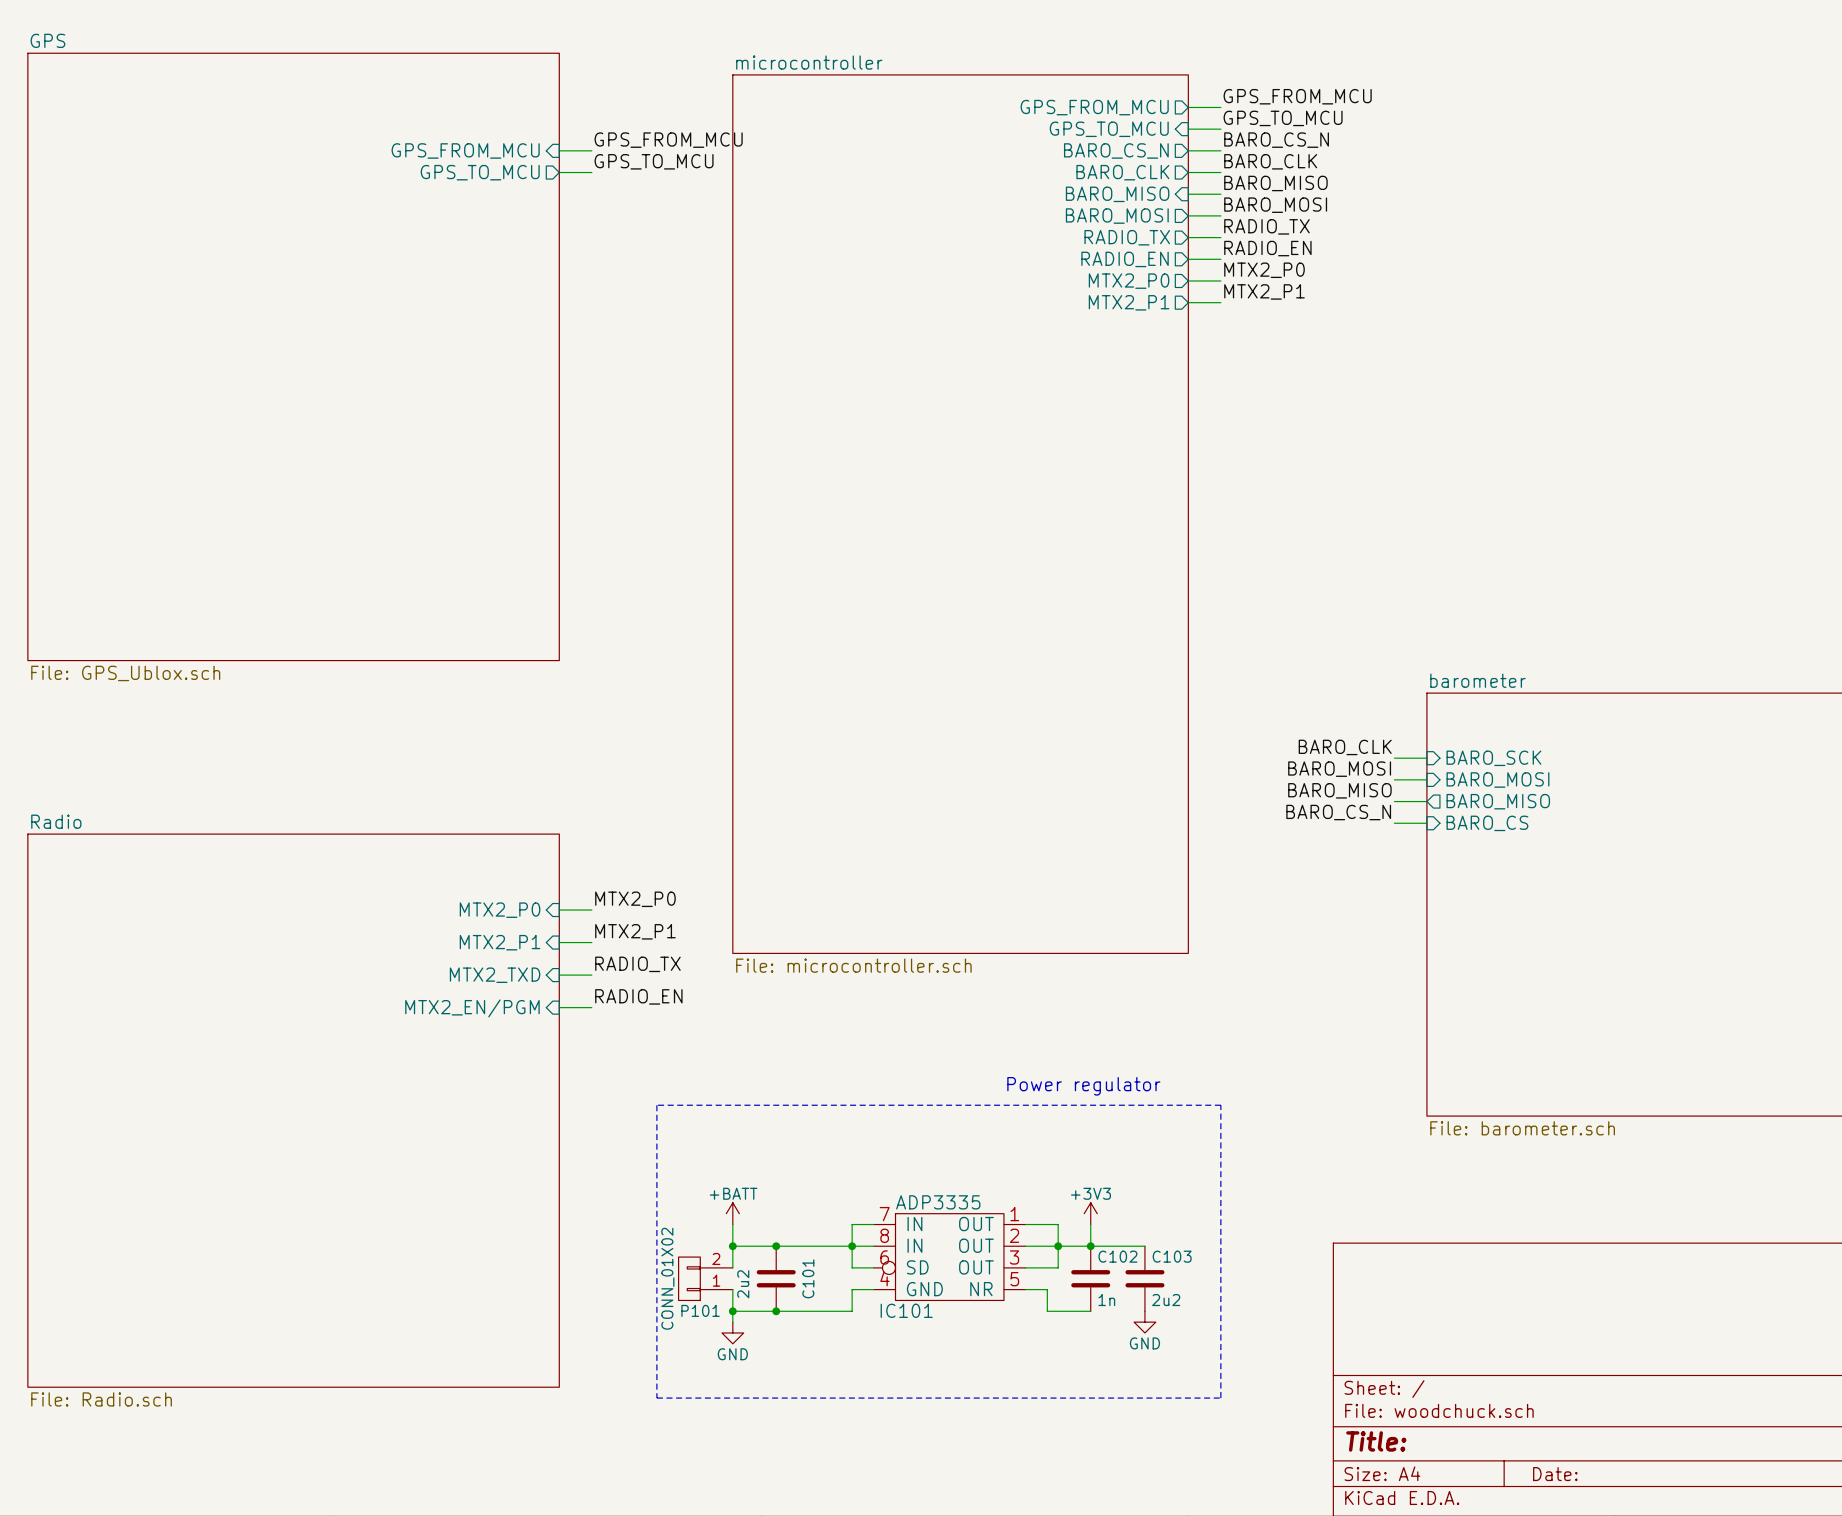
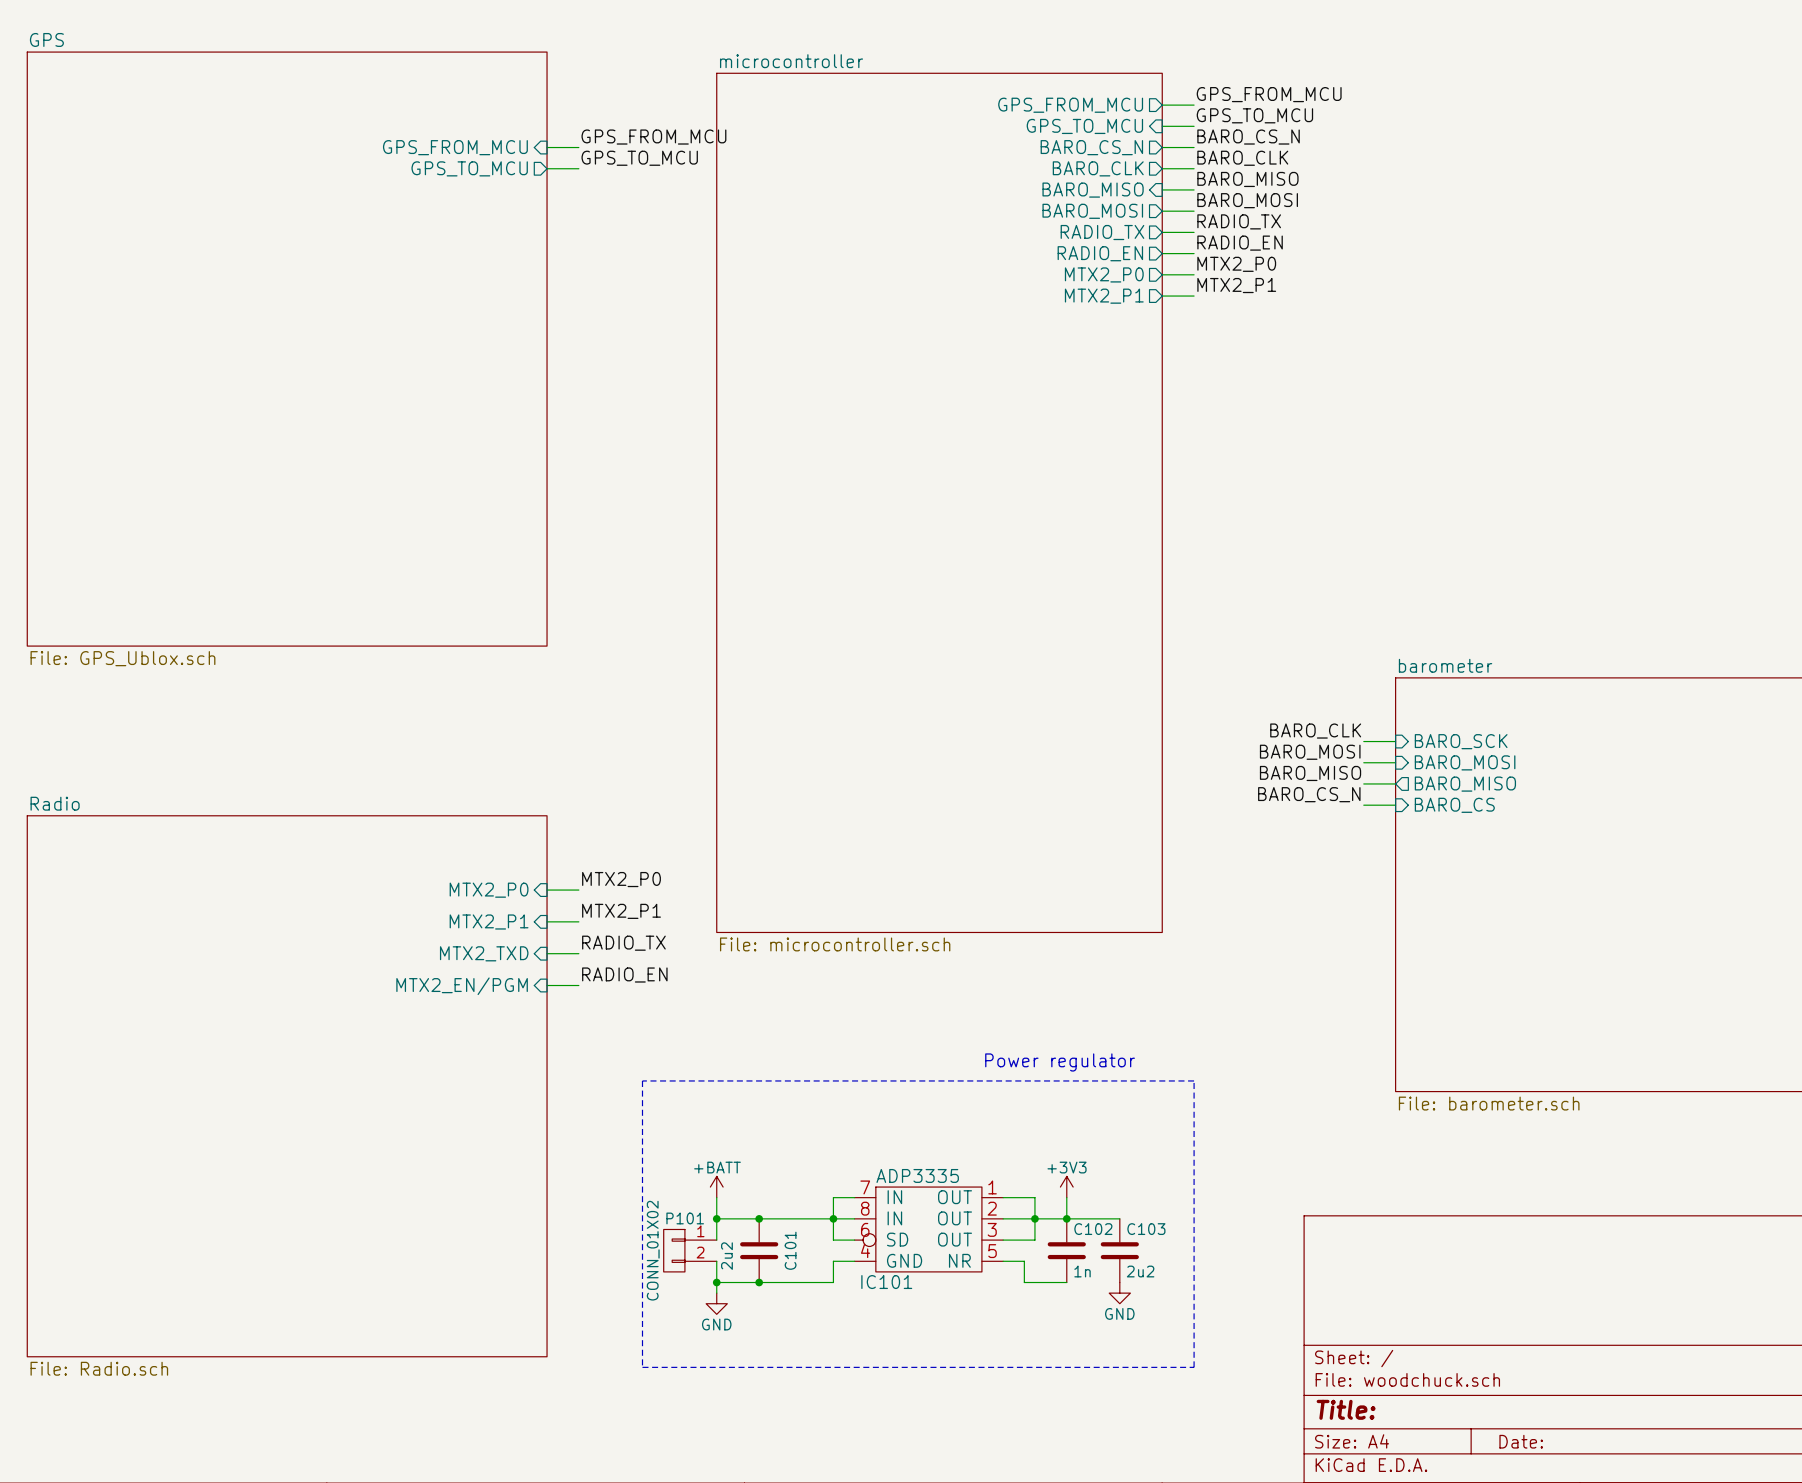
P101 flip: as is (689, 1278) -> up-down (674, 1250)

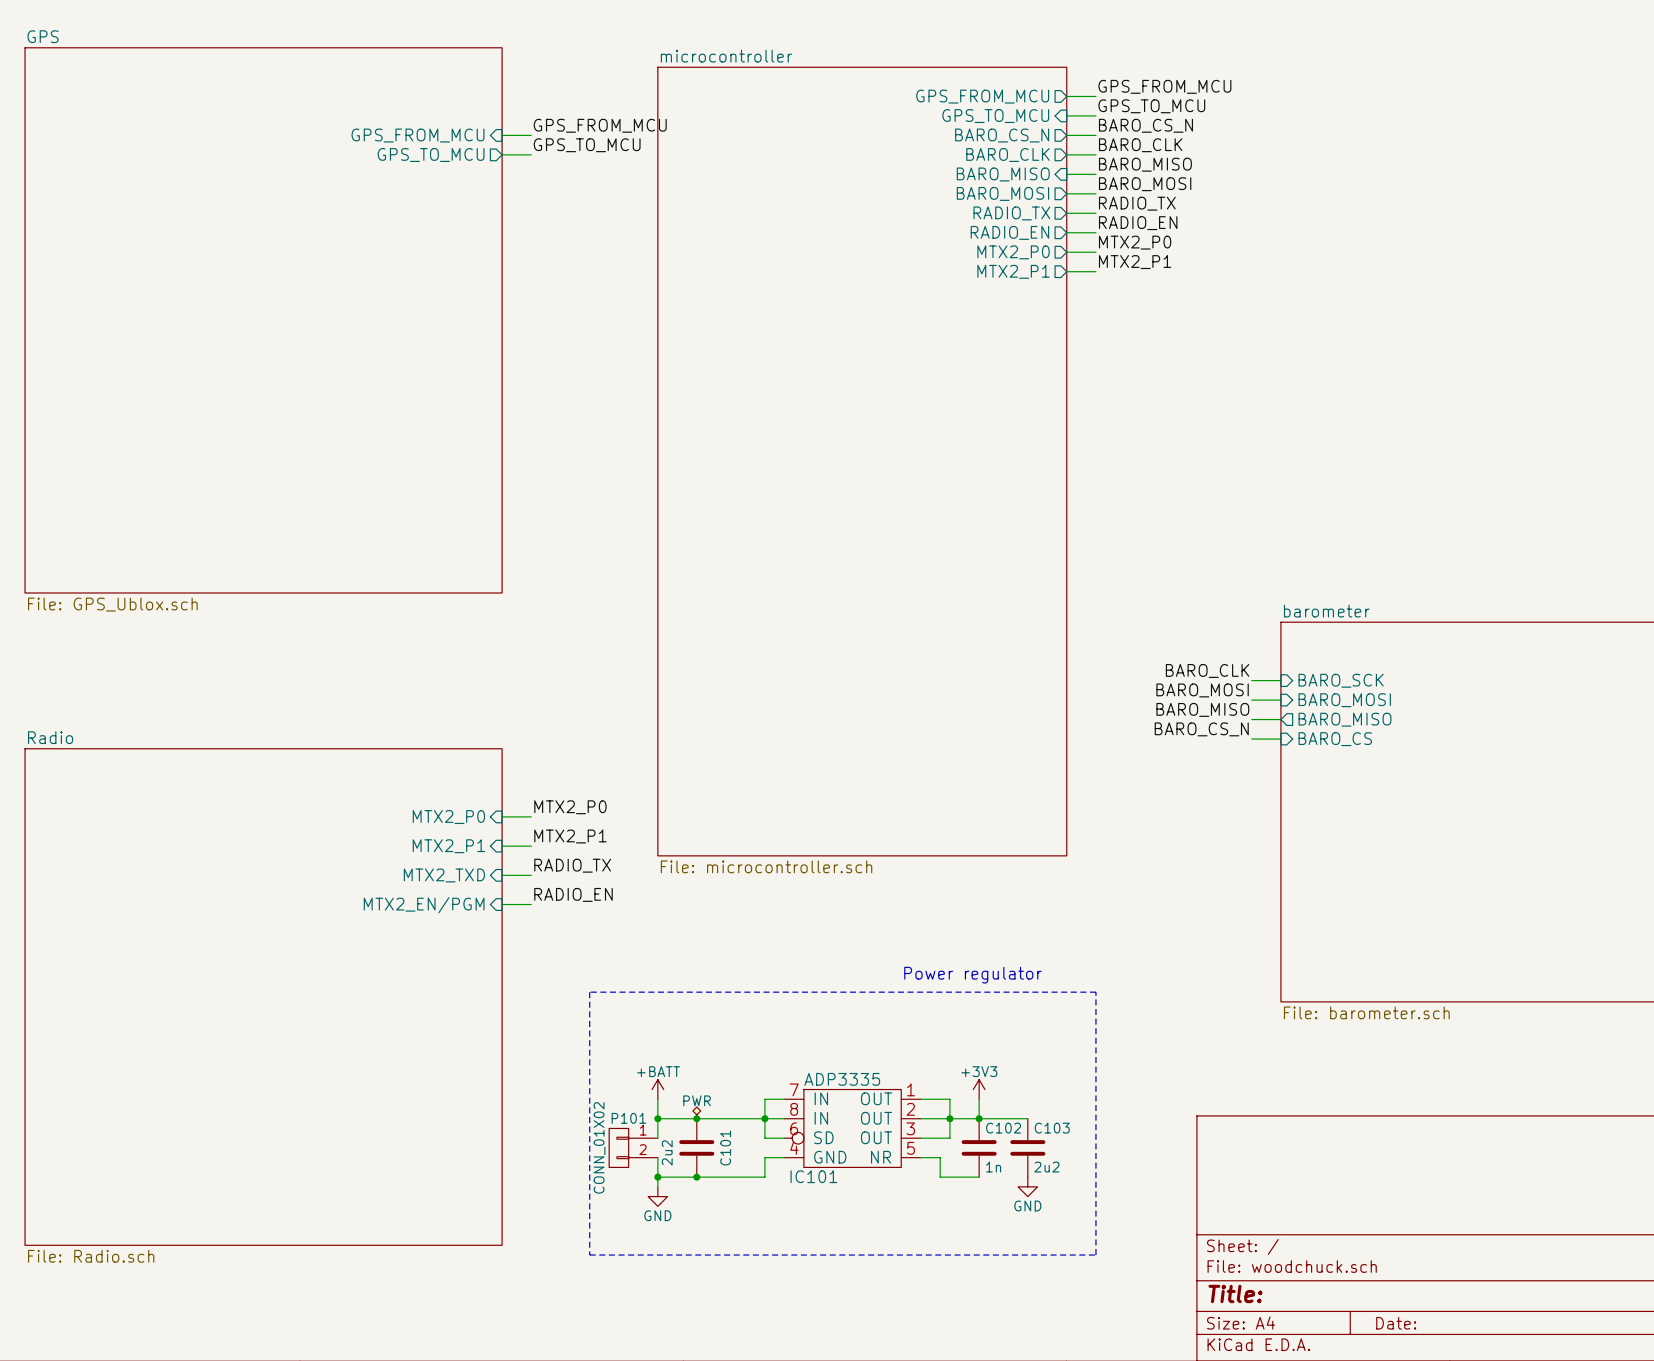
power symbol: none -> PWR (696, 1112)

